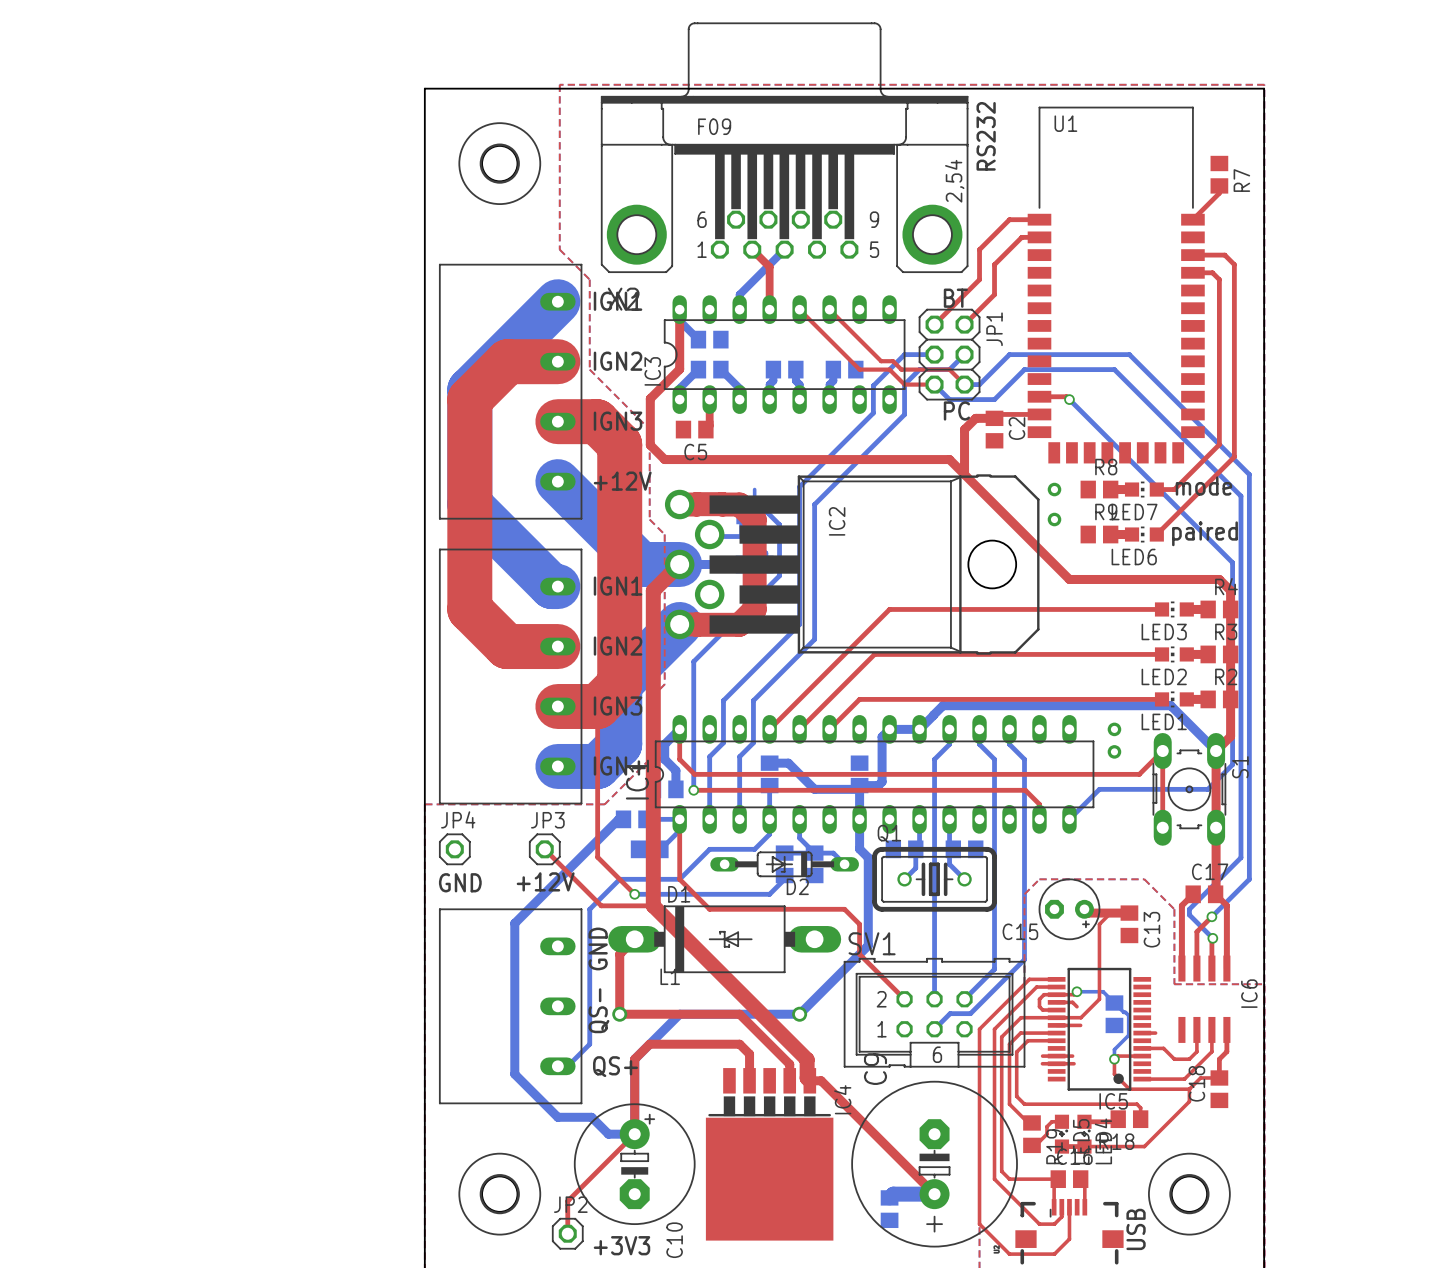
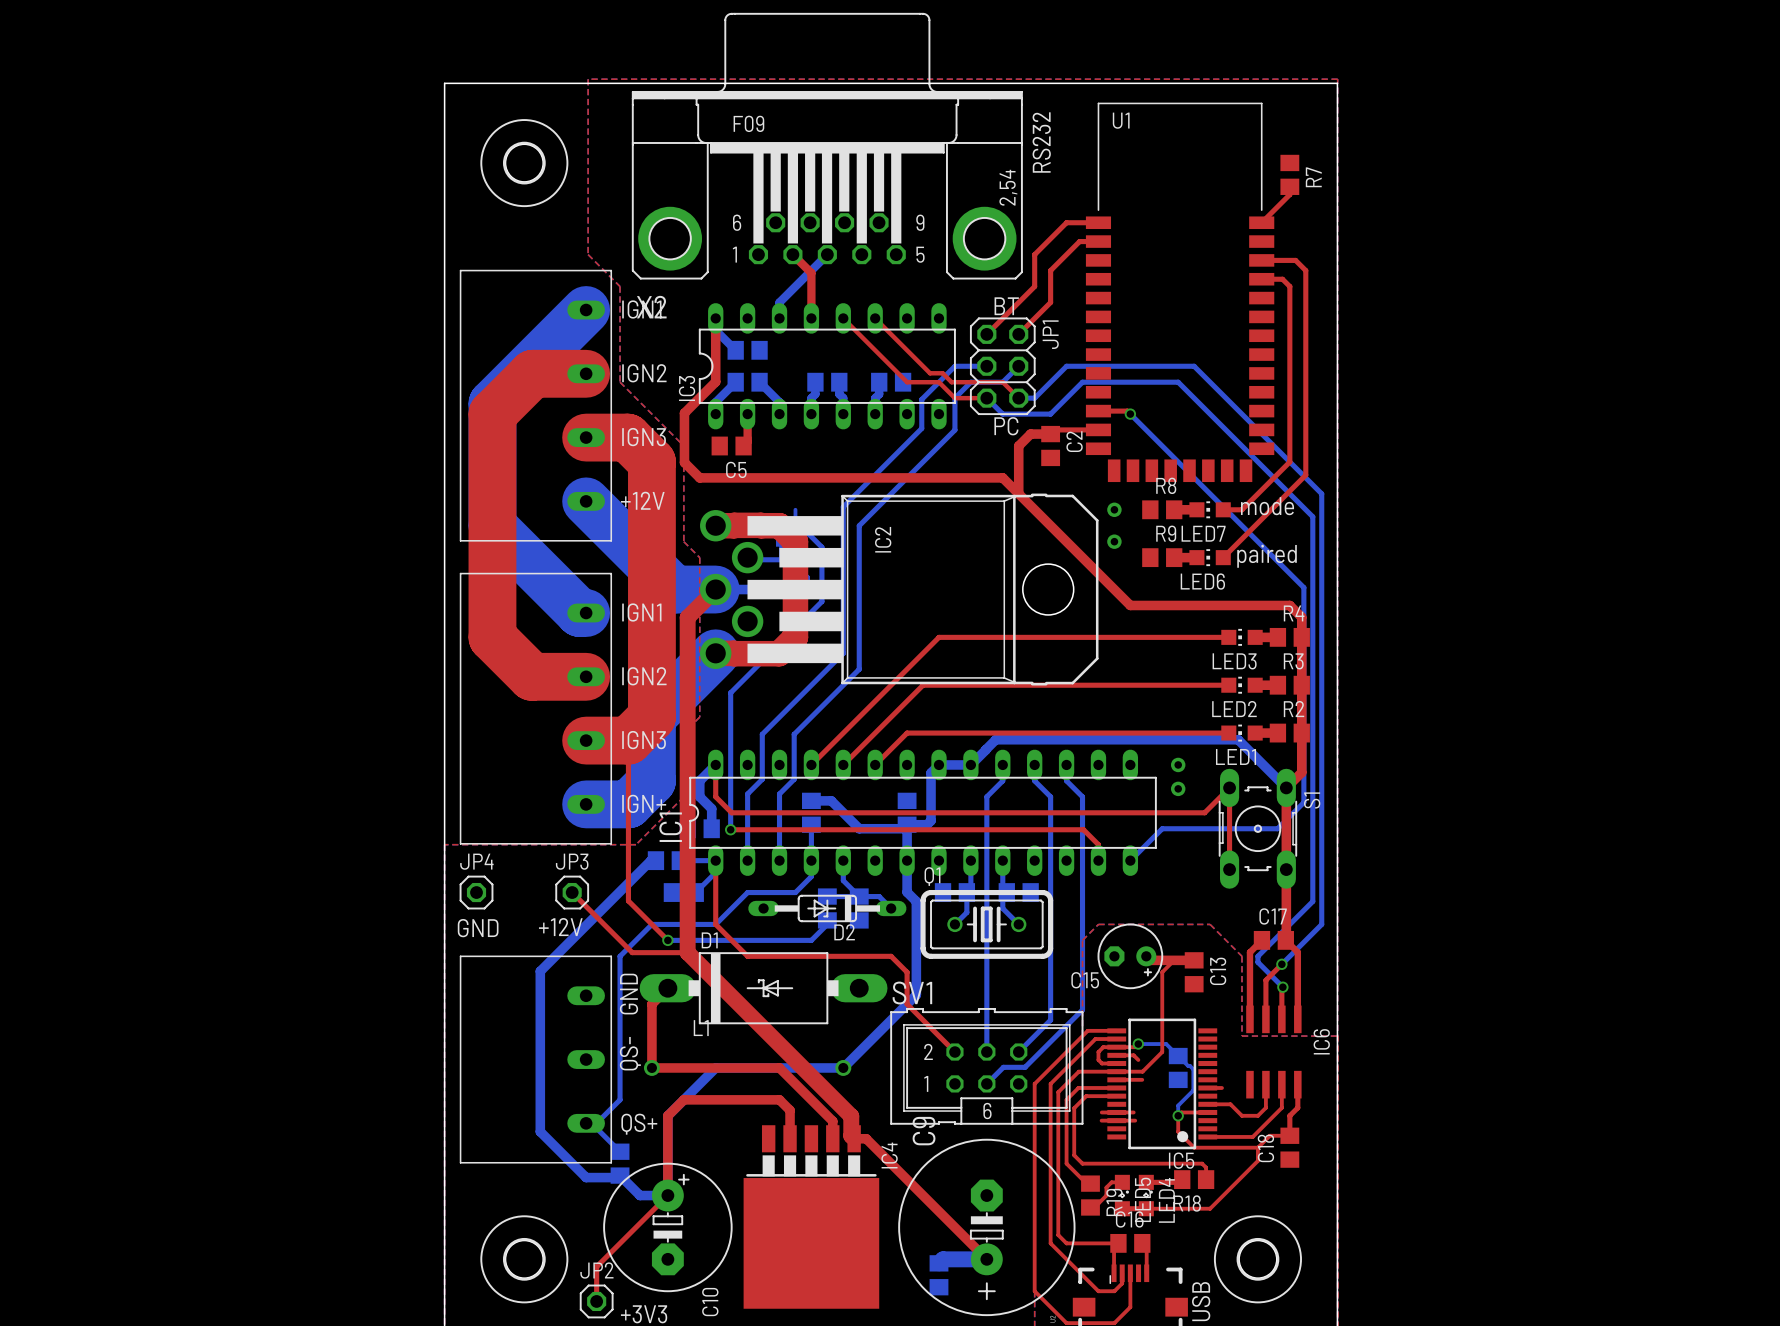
bottom track: none -> (591, 1123) (620, 1151)
part: none -> (620, 1163)

